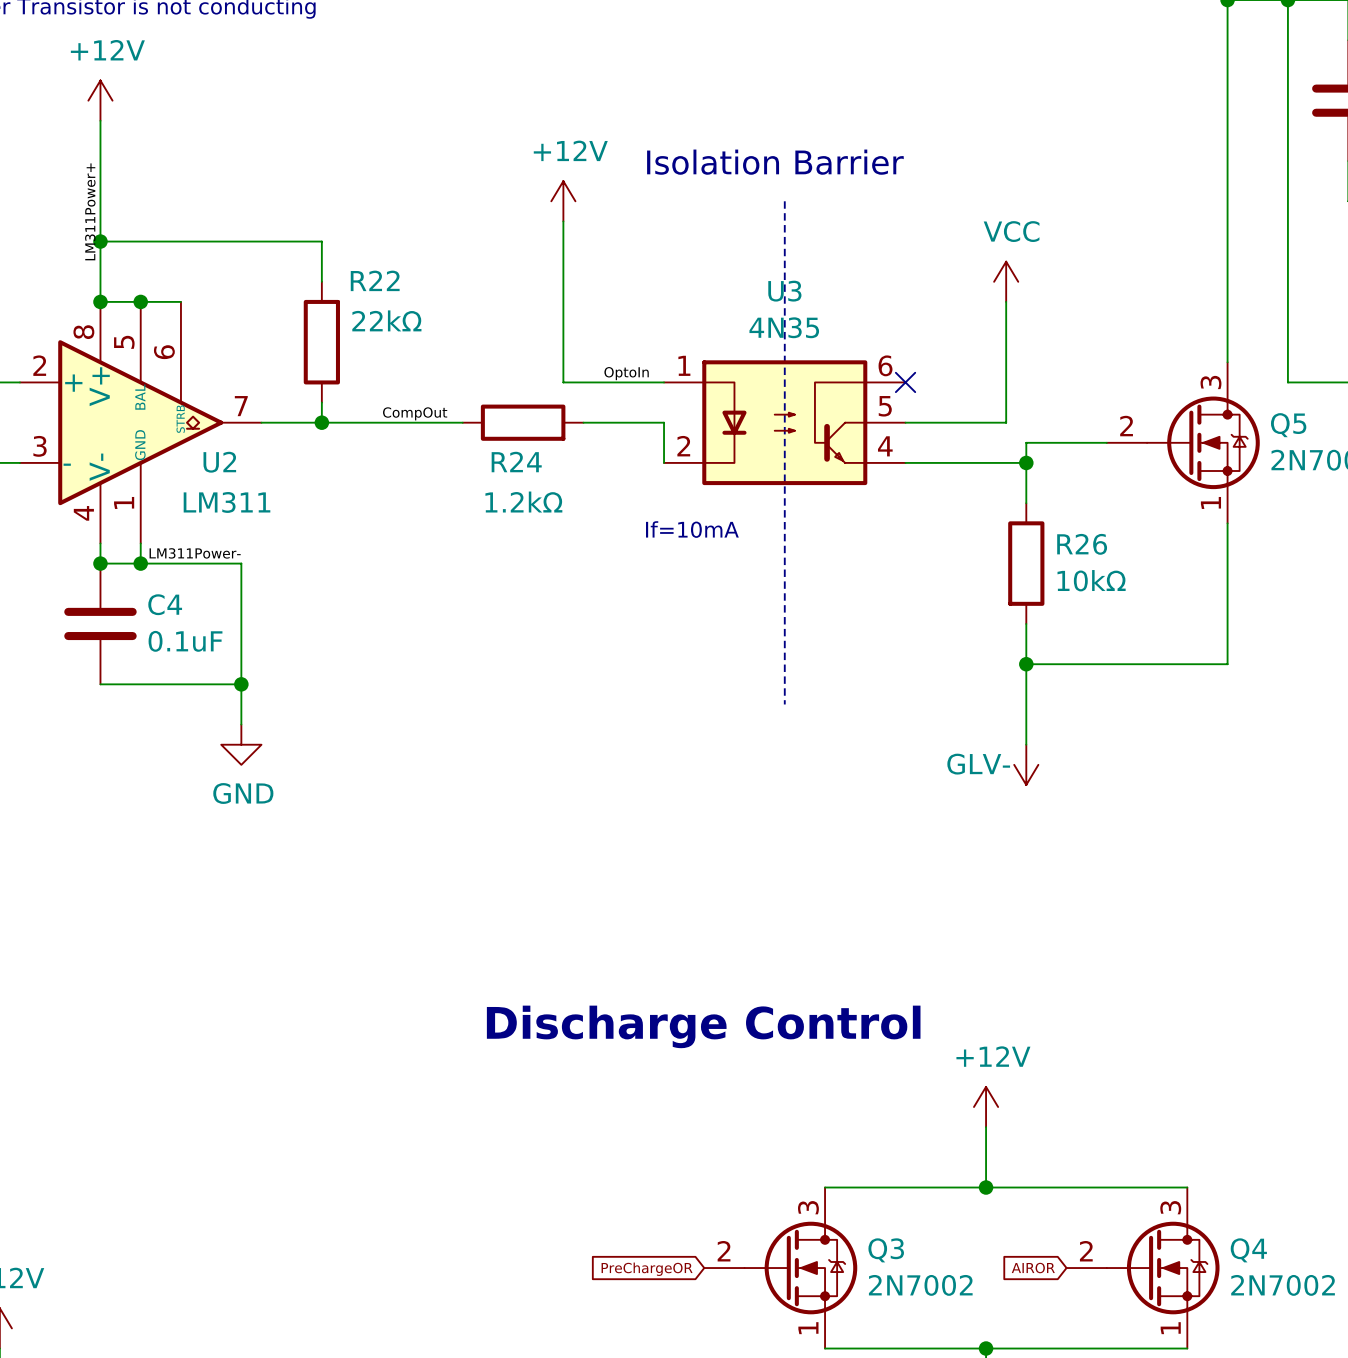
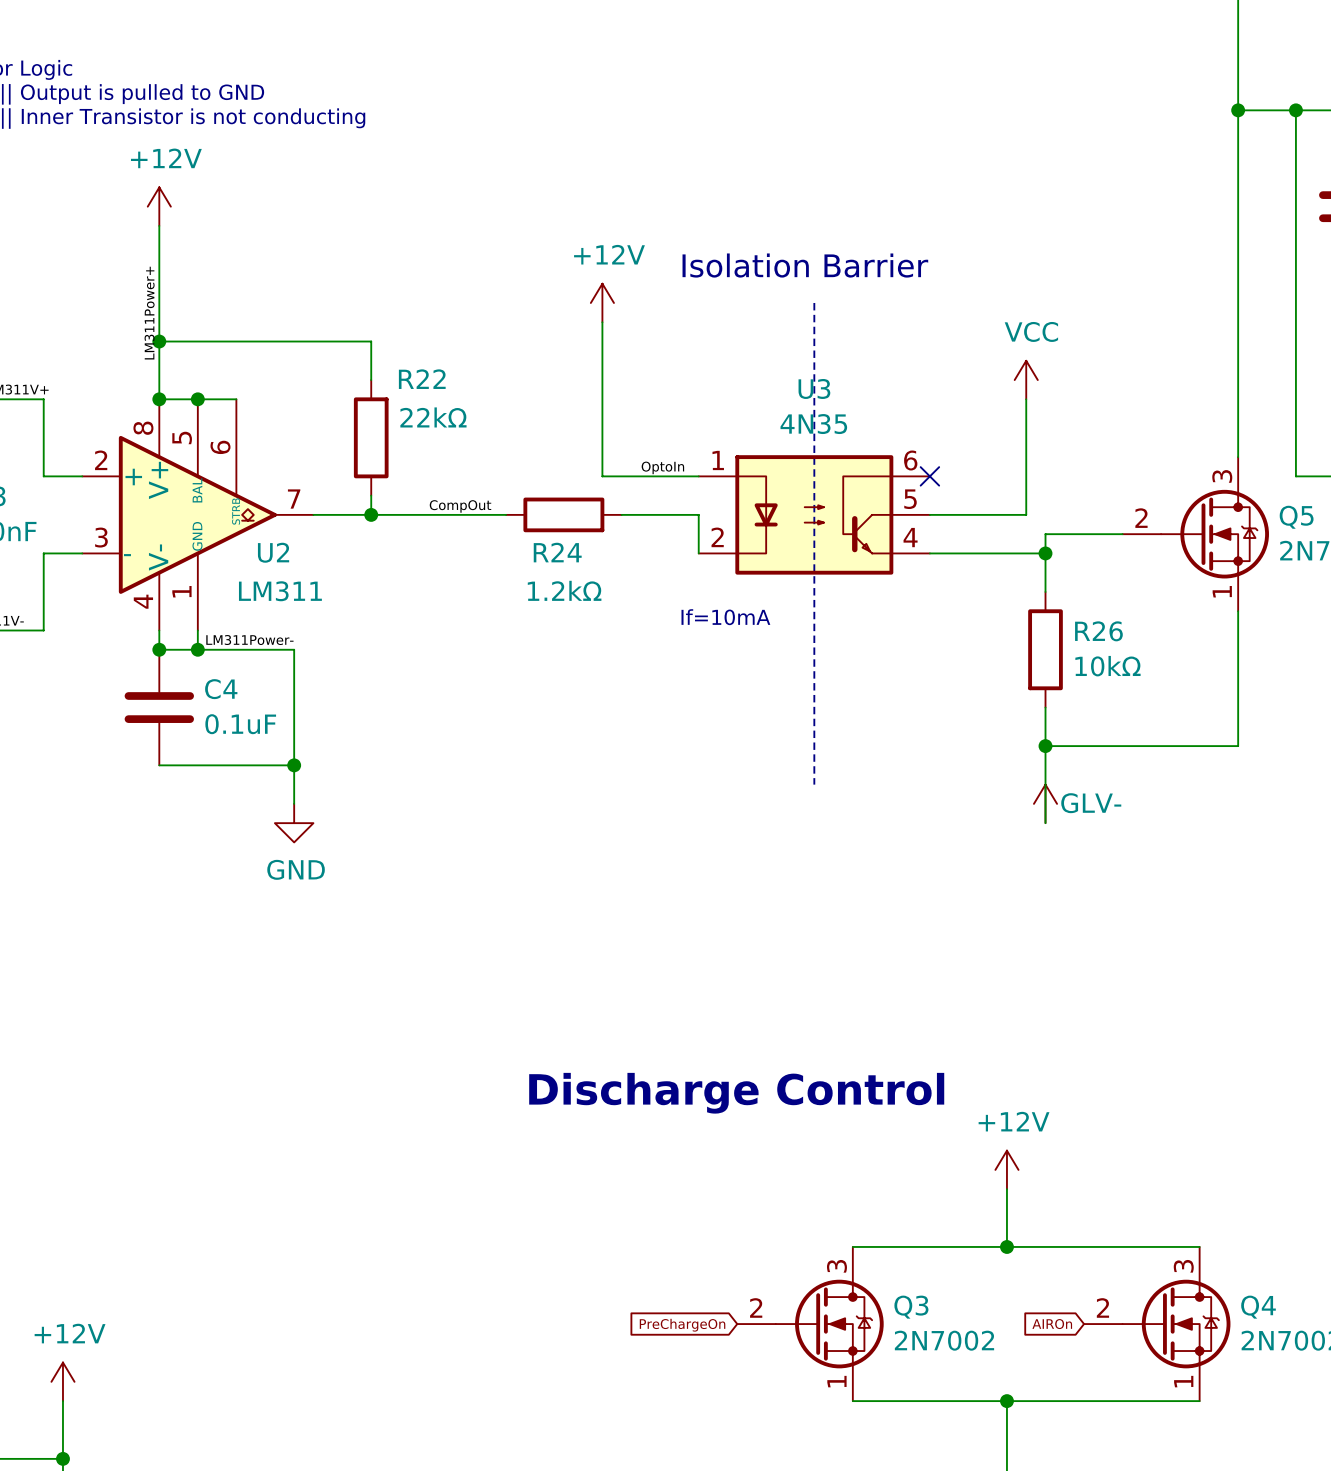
power symbol rotation: 0° (1026, 764) -> 180° (1045, 803)
power symbol position: GLV- (1026, 764) -> GLV- (1045, 803)
global label: AIROR (1033, 1268) -> AIROn (1052, 1324)
global label: PreChargeOR (647, 1269) -> PreChargeOn (682, 1325)

